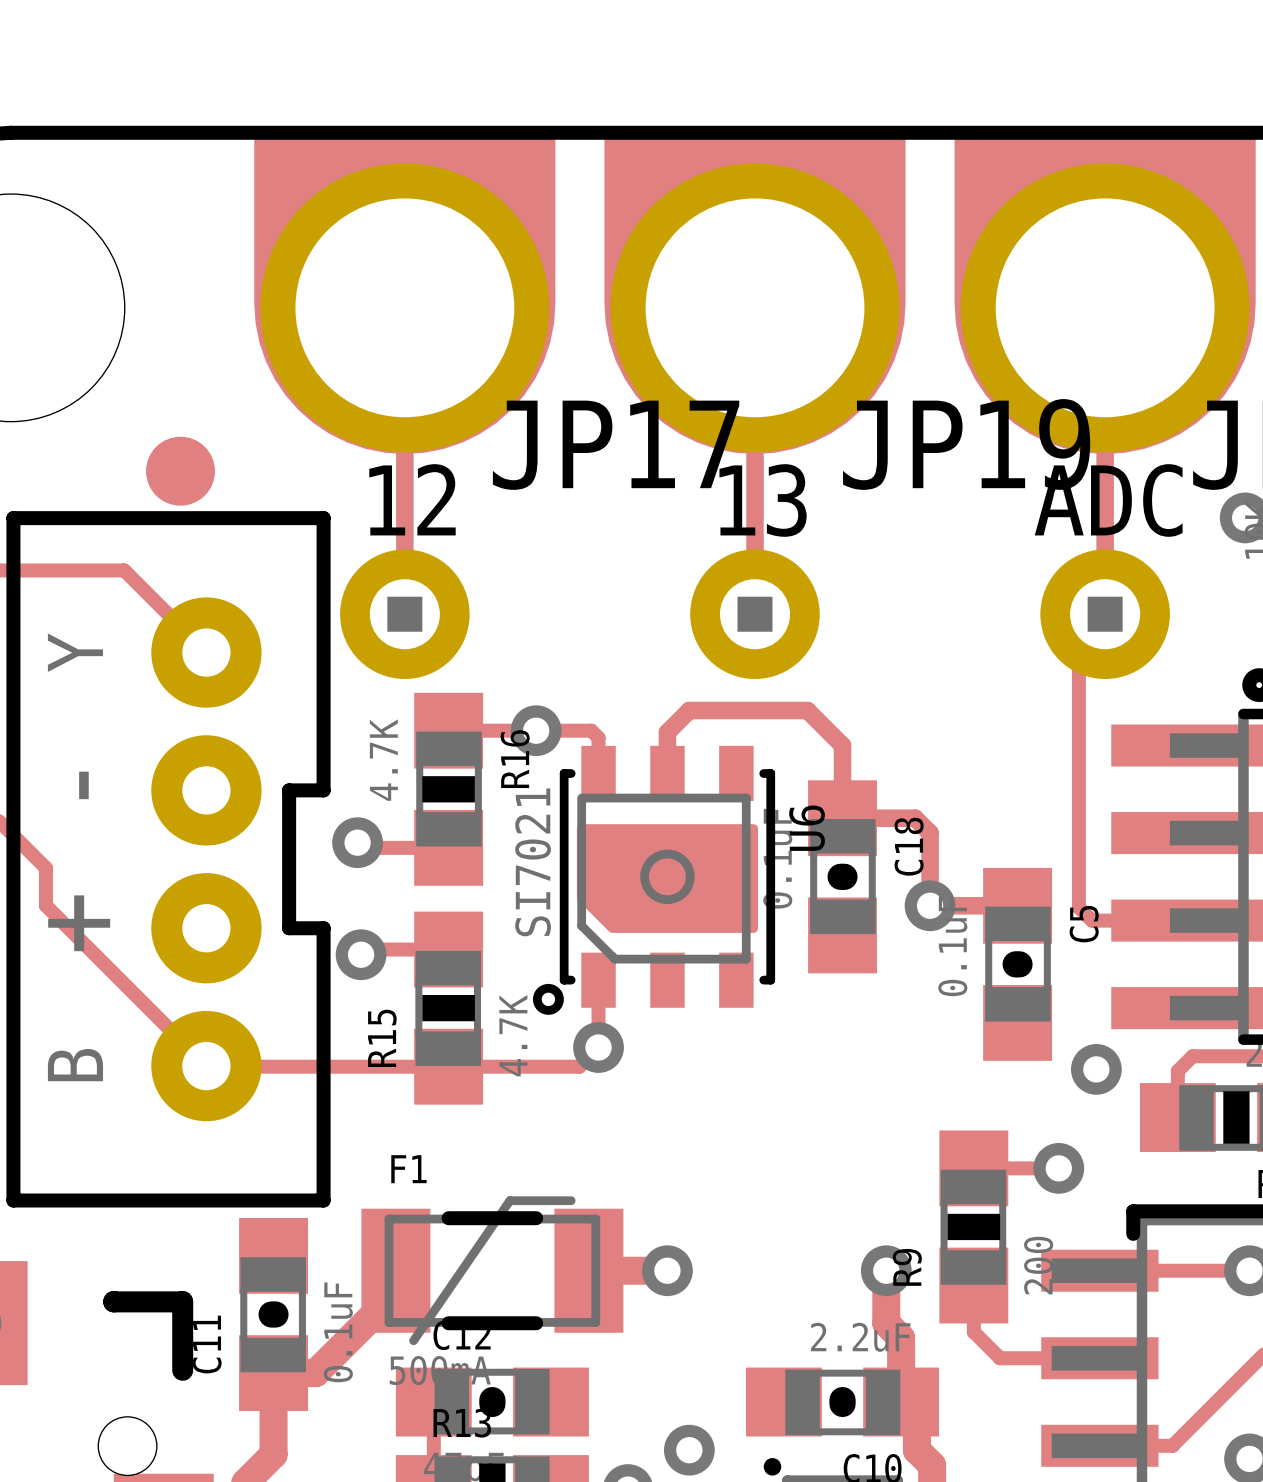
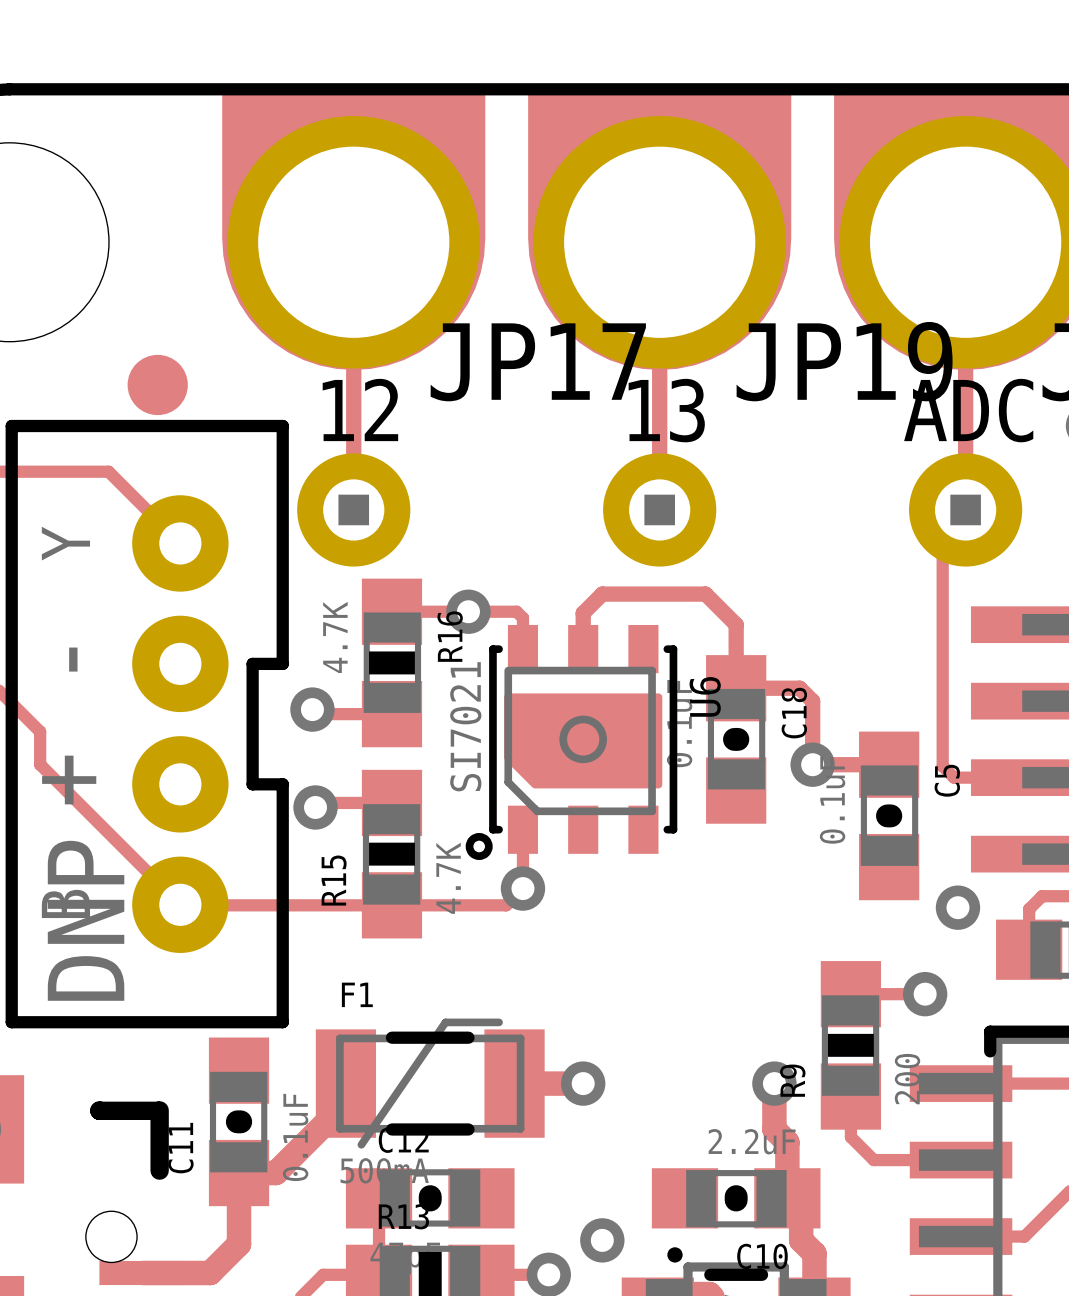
part value: none -> DNP (86, 920)

